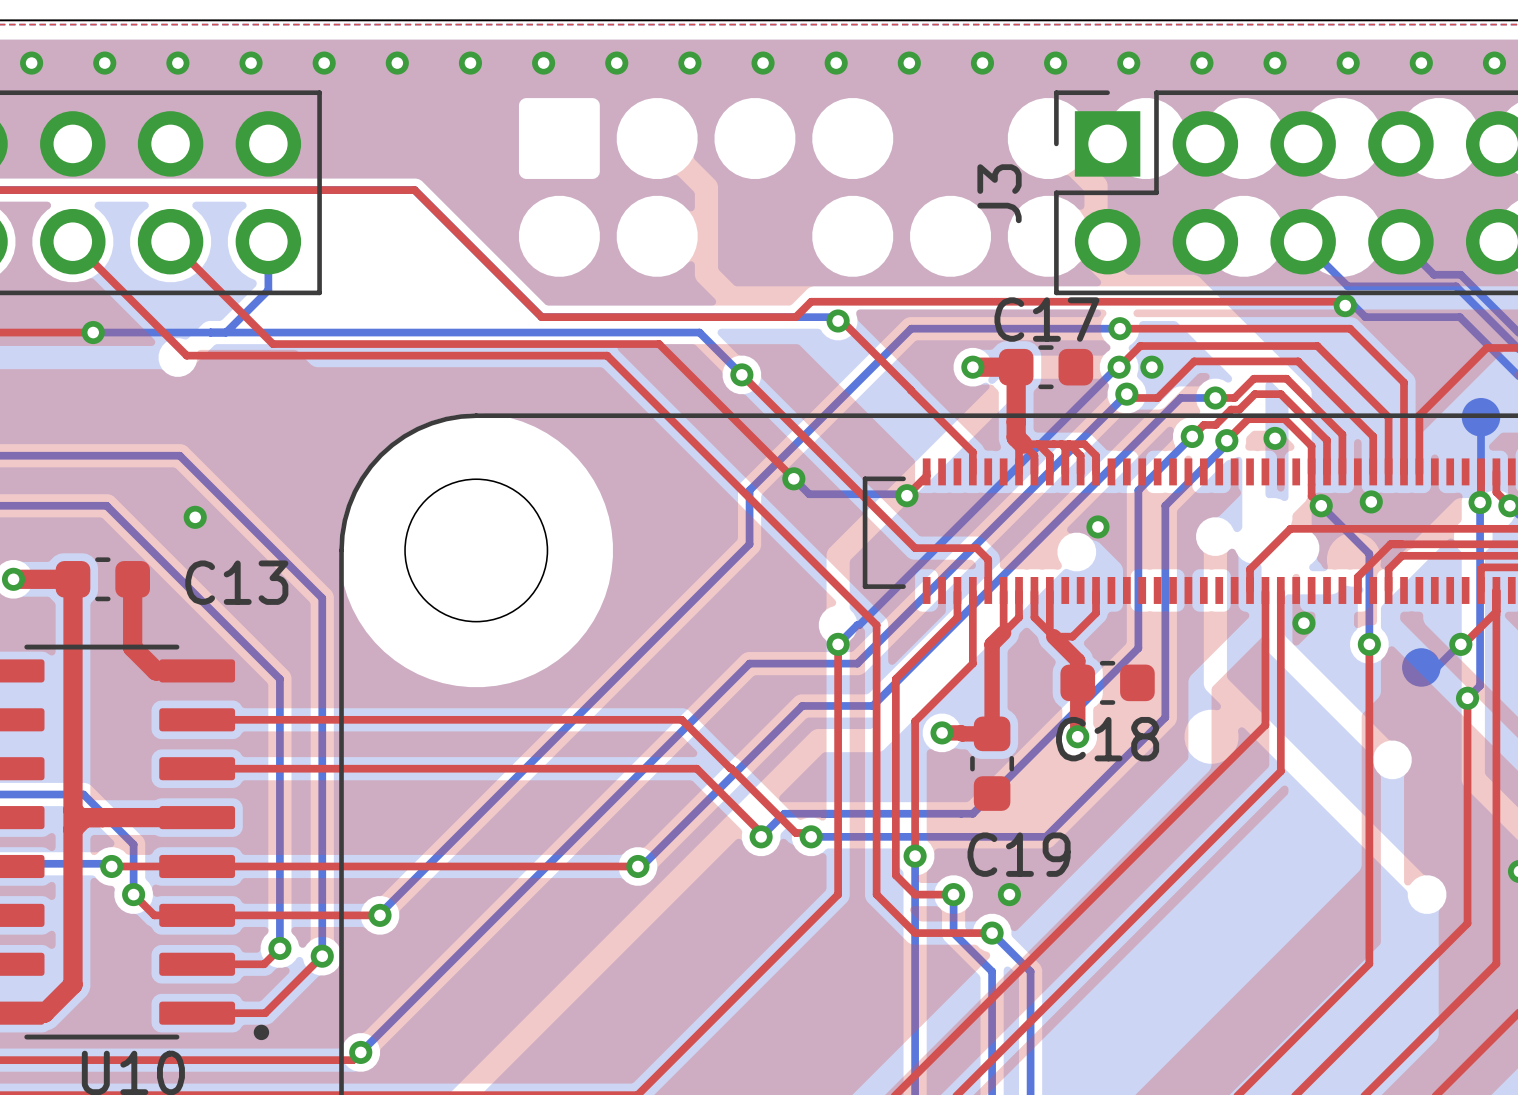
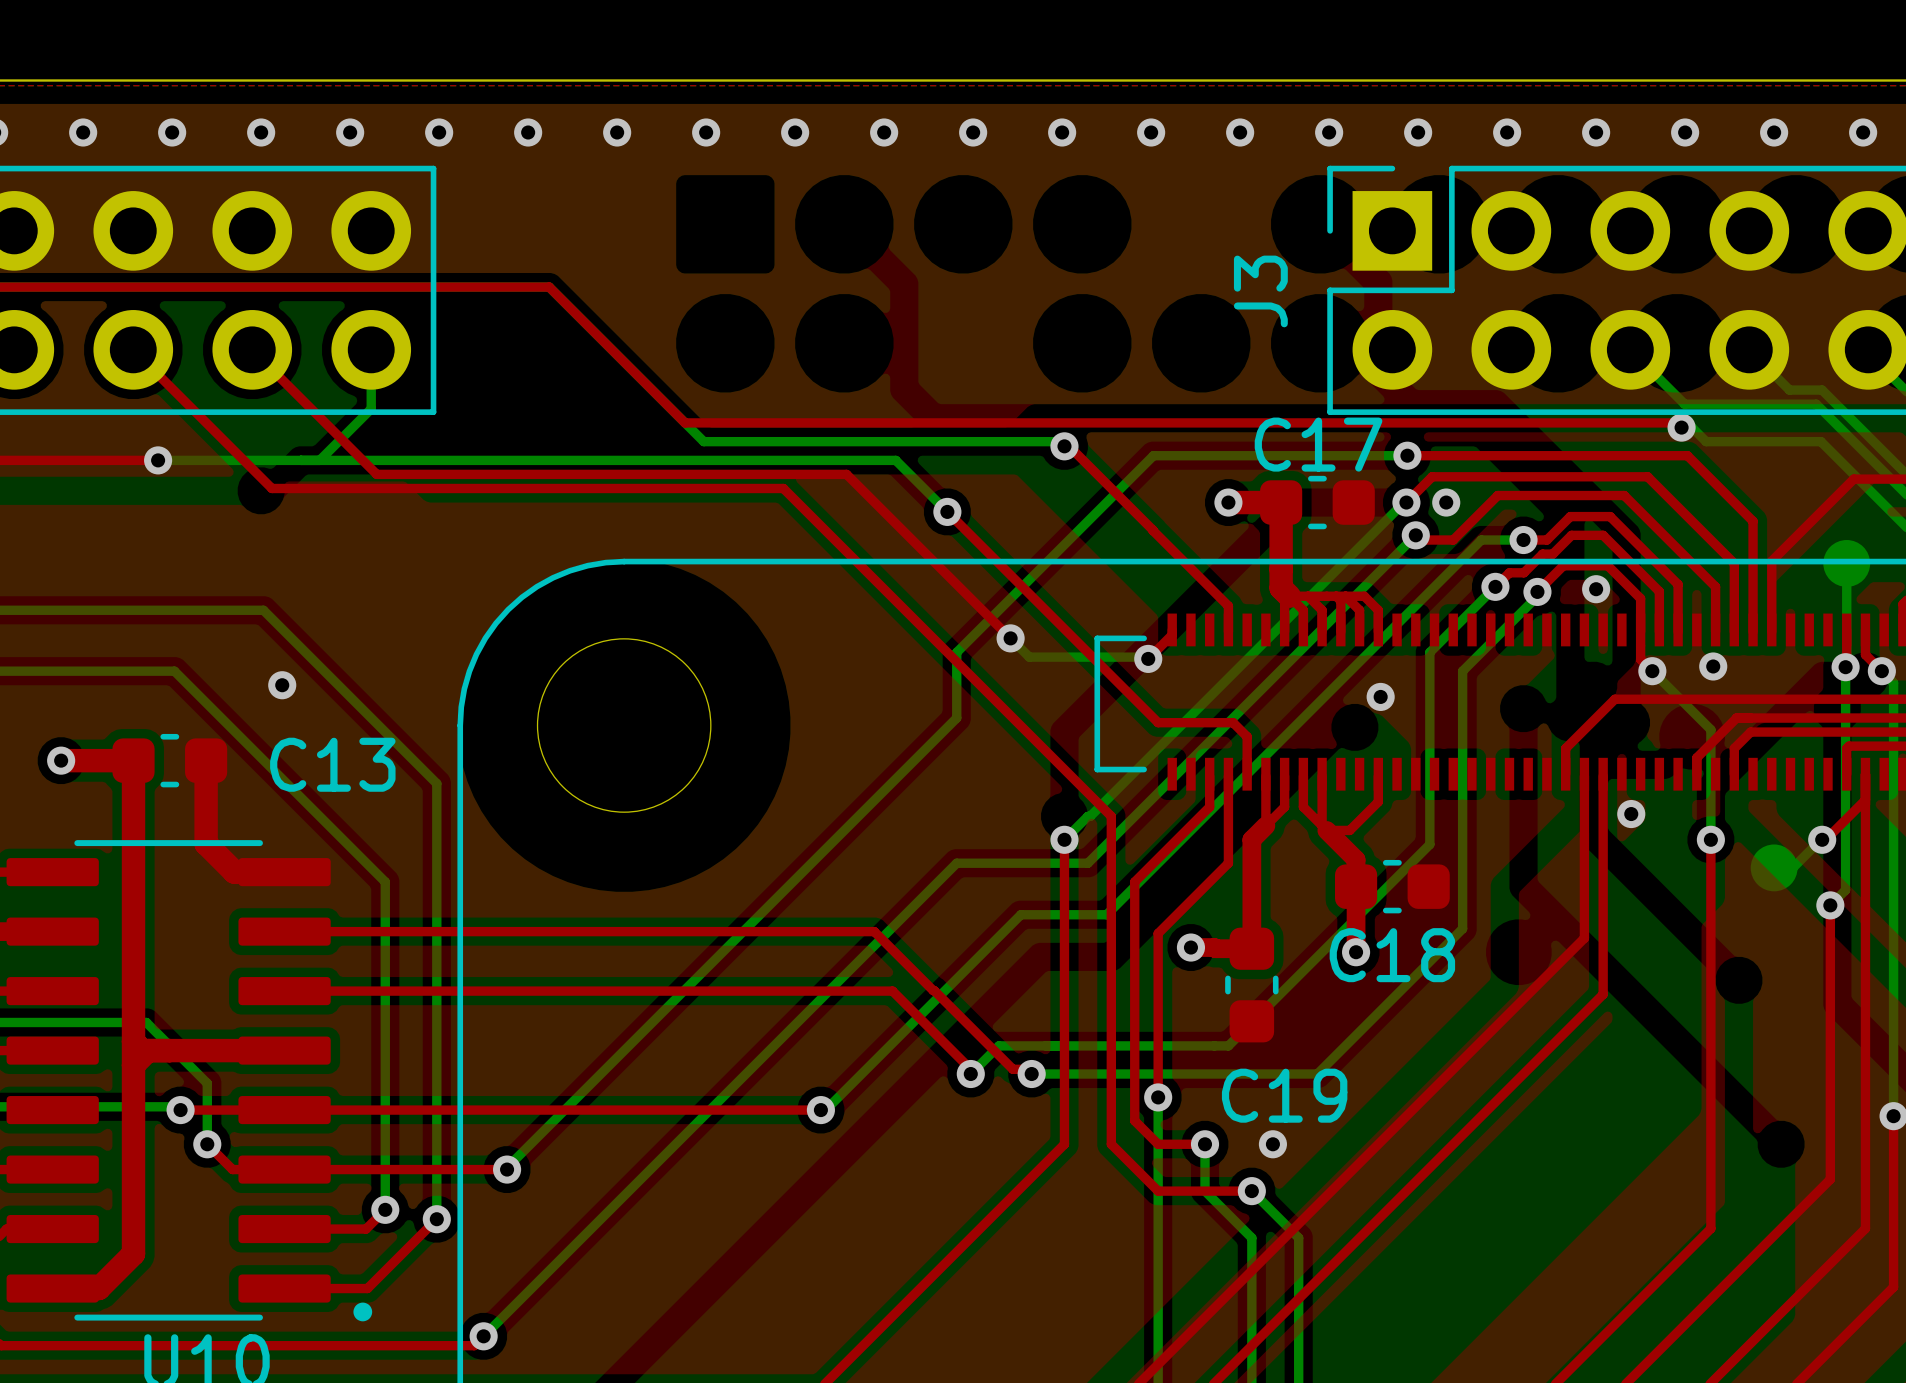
top track: (526, 301) (541, 317) (795, 317) (811, 301) -> (685, 422) (1031, 422)

